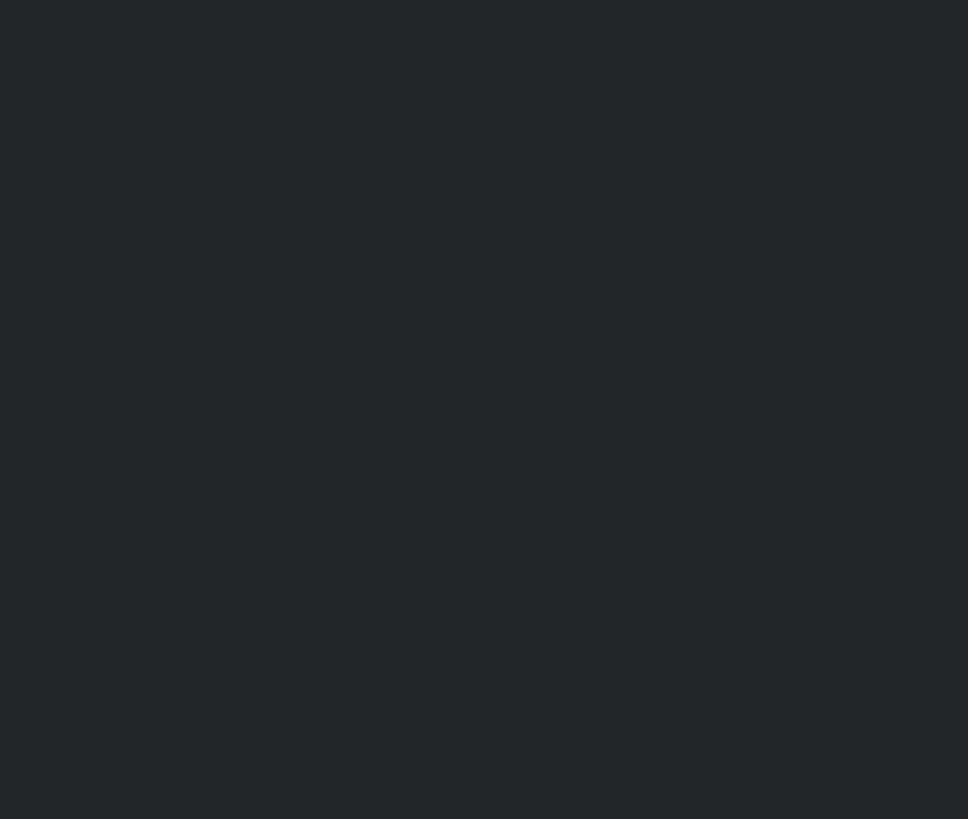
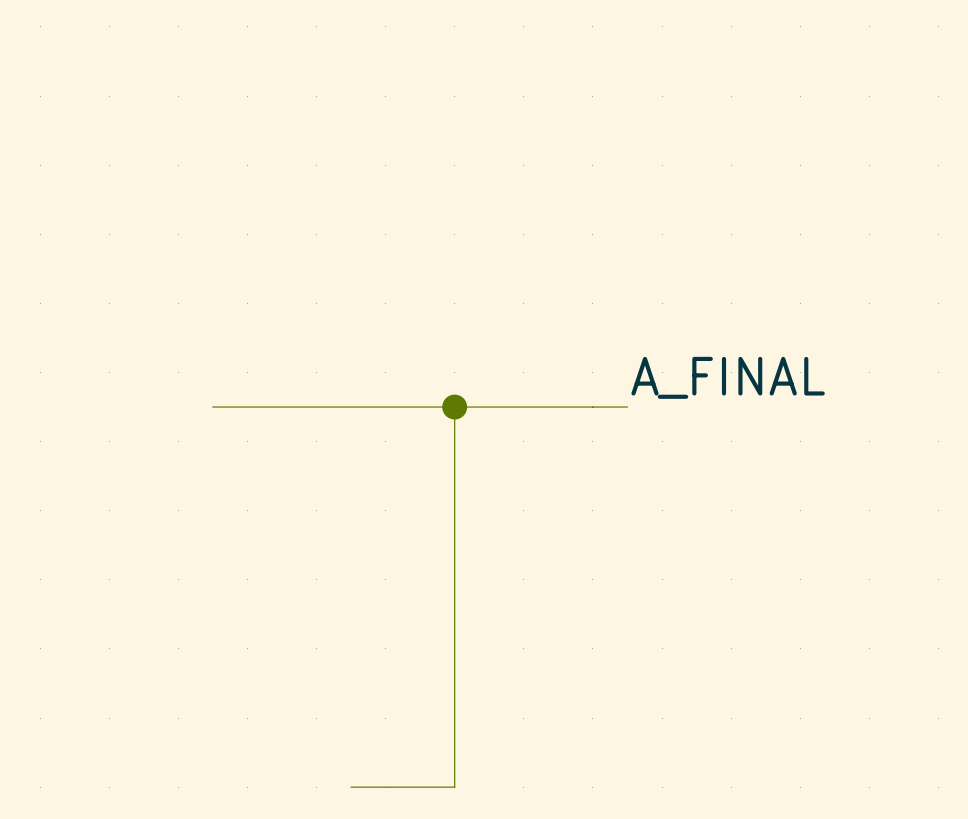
label: none -> A_FINAL (728, 377)
wire: none -> (212, 407) (627, 407)
wire: none -> (454, 407) (454, 787) (351, 787)
junction: none -> (454, 407)

